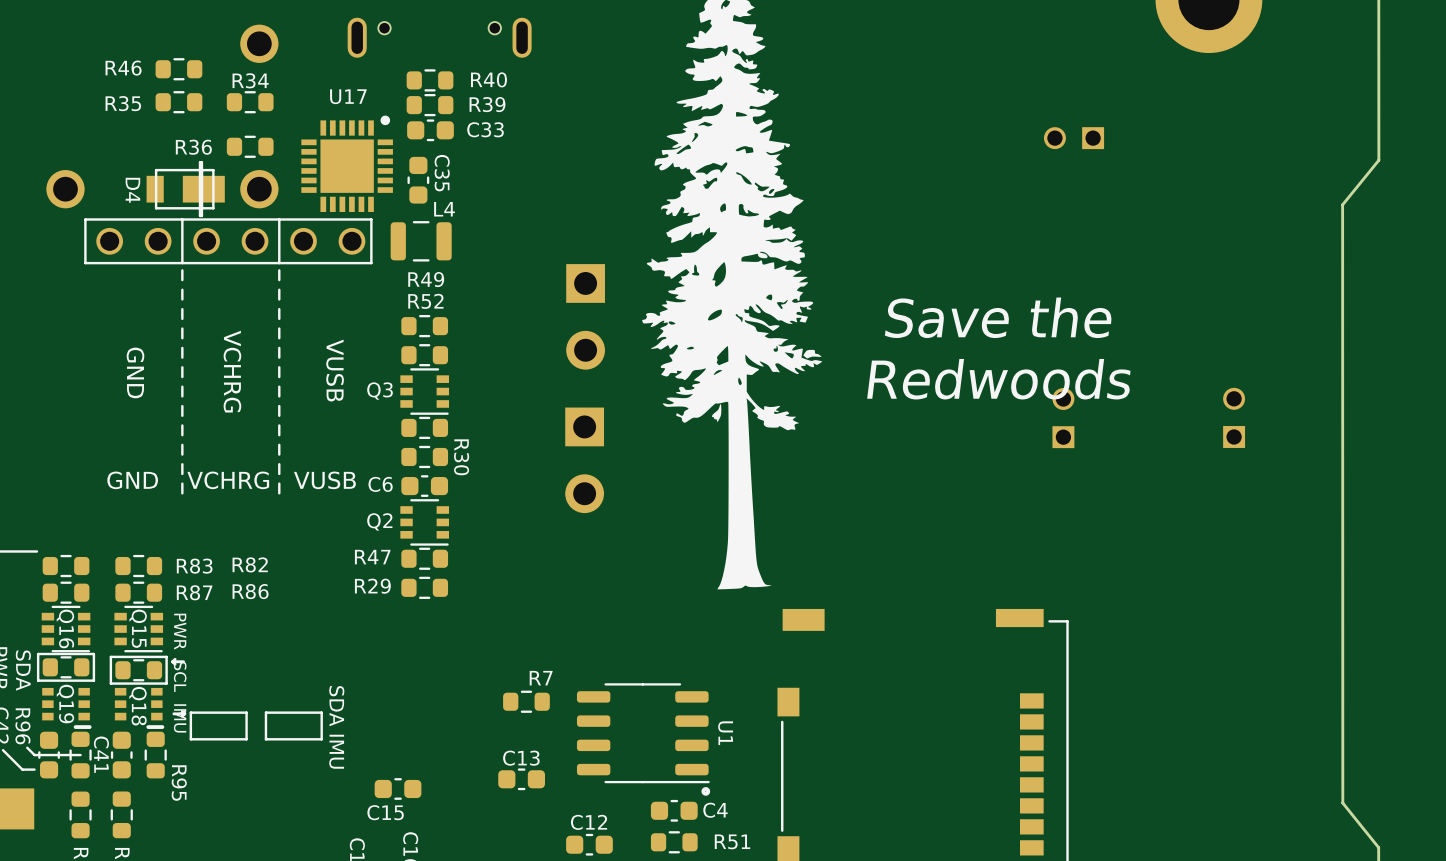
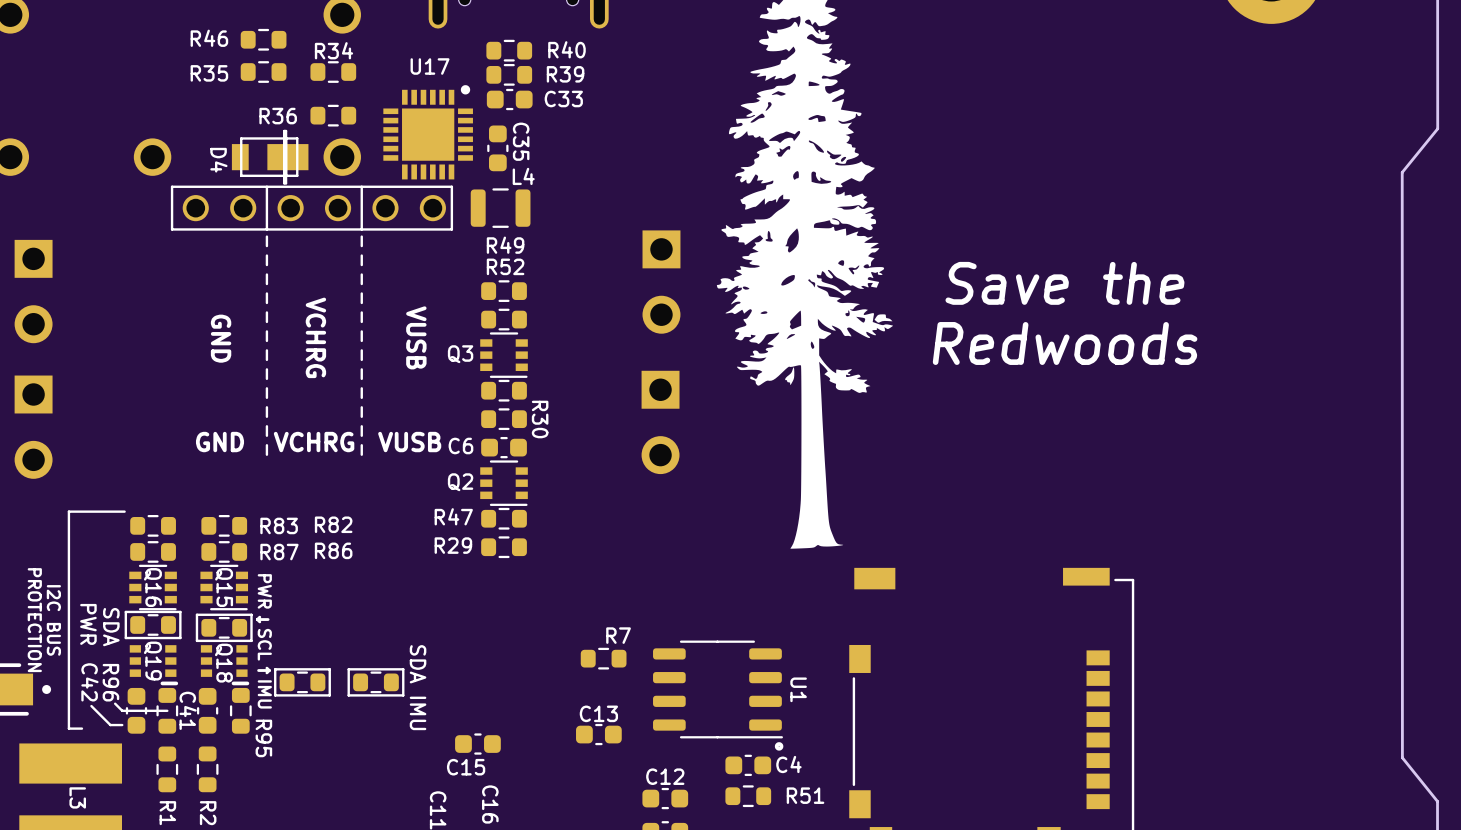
part: (1074, 138) -> none
part: (1234, 417) -> none
part: (1063, 418) -> none
part: none -> (302, 682)
part: none -> (375, 682)

